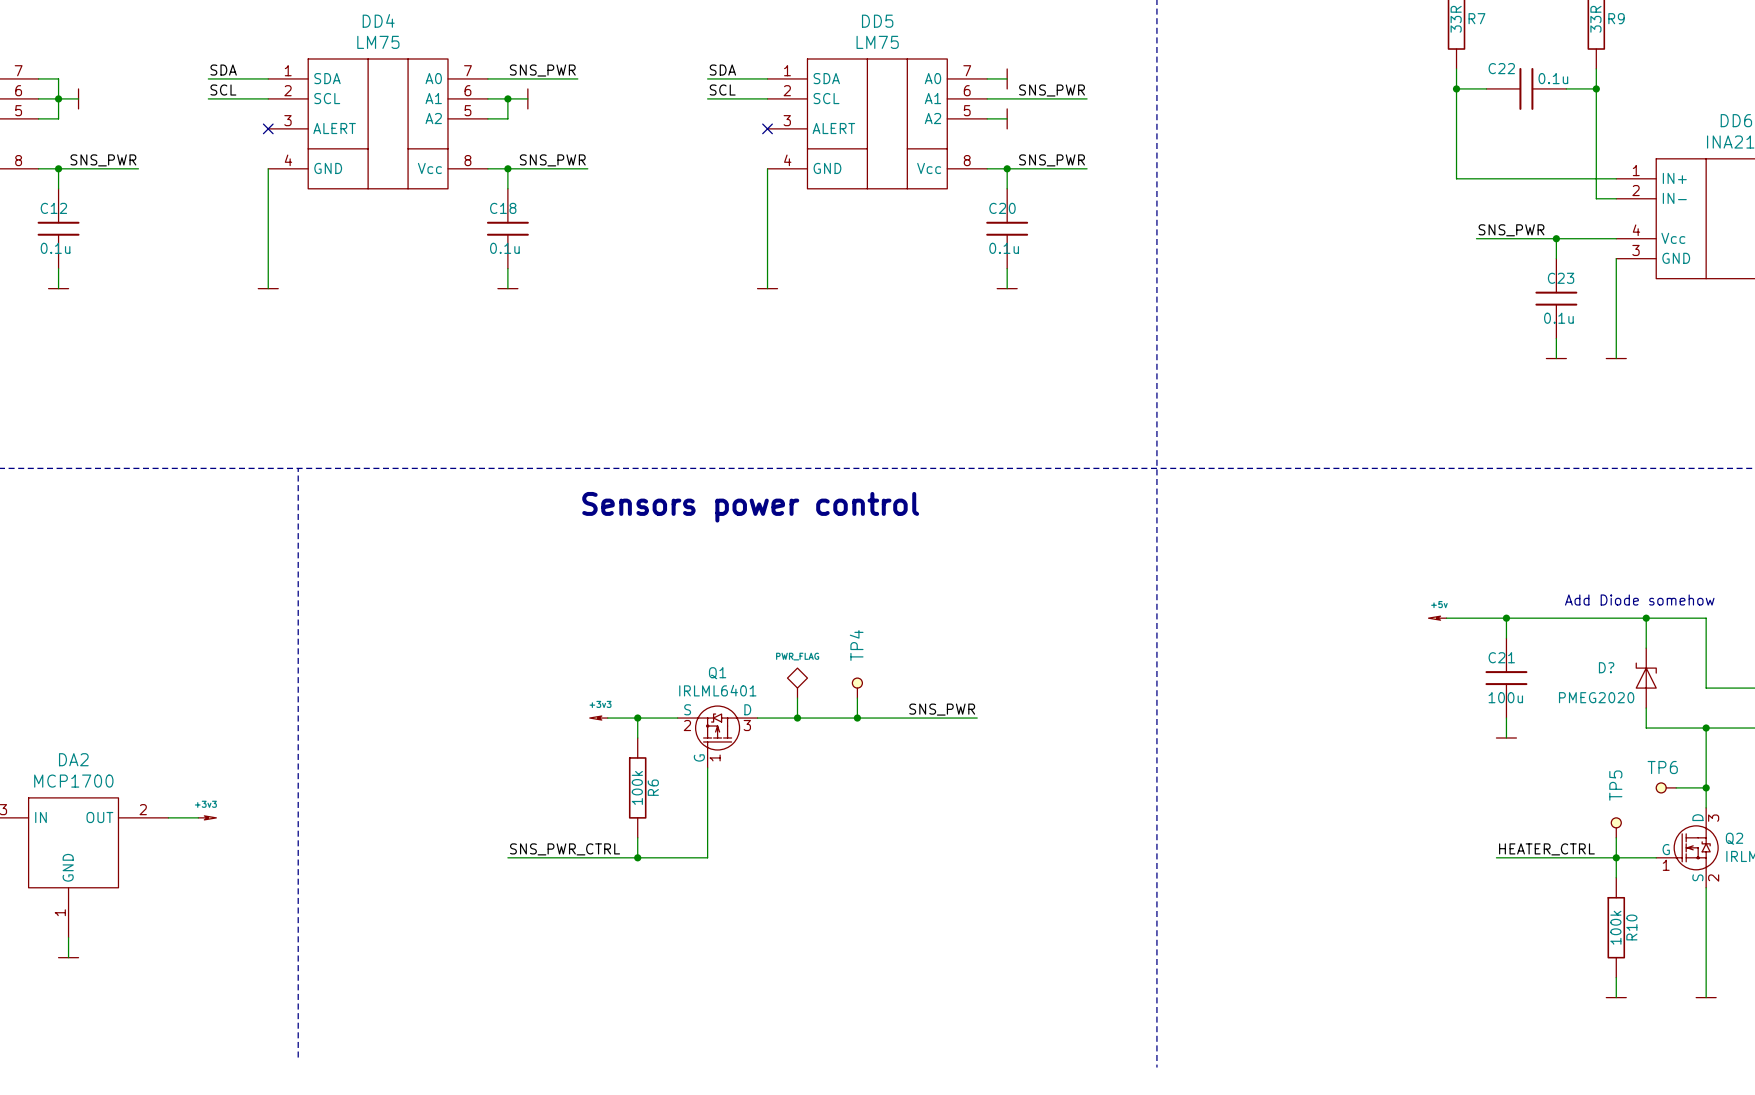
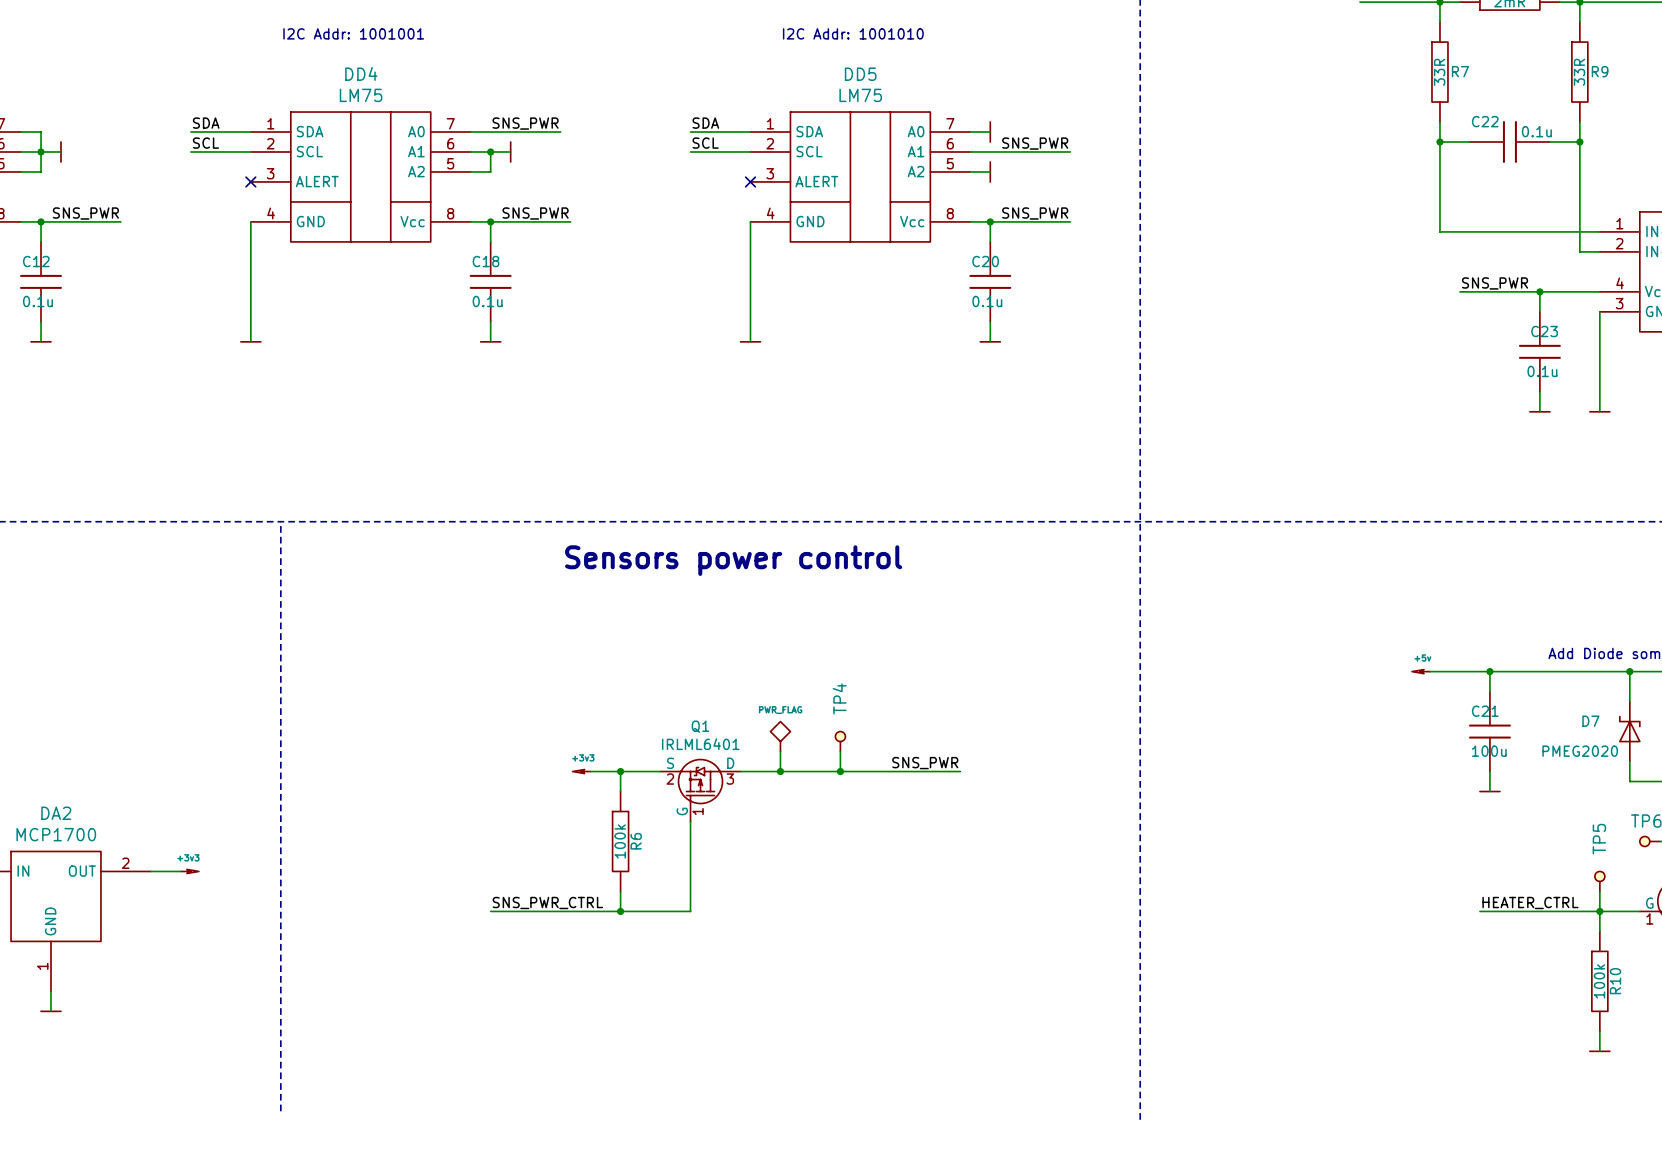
D? name: D? (1606, 667) -> D7 (1590, 721)

